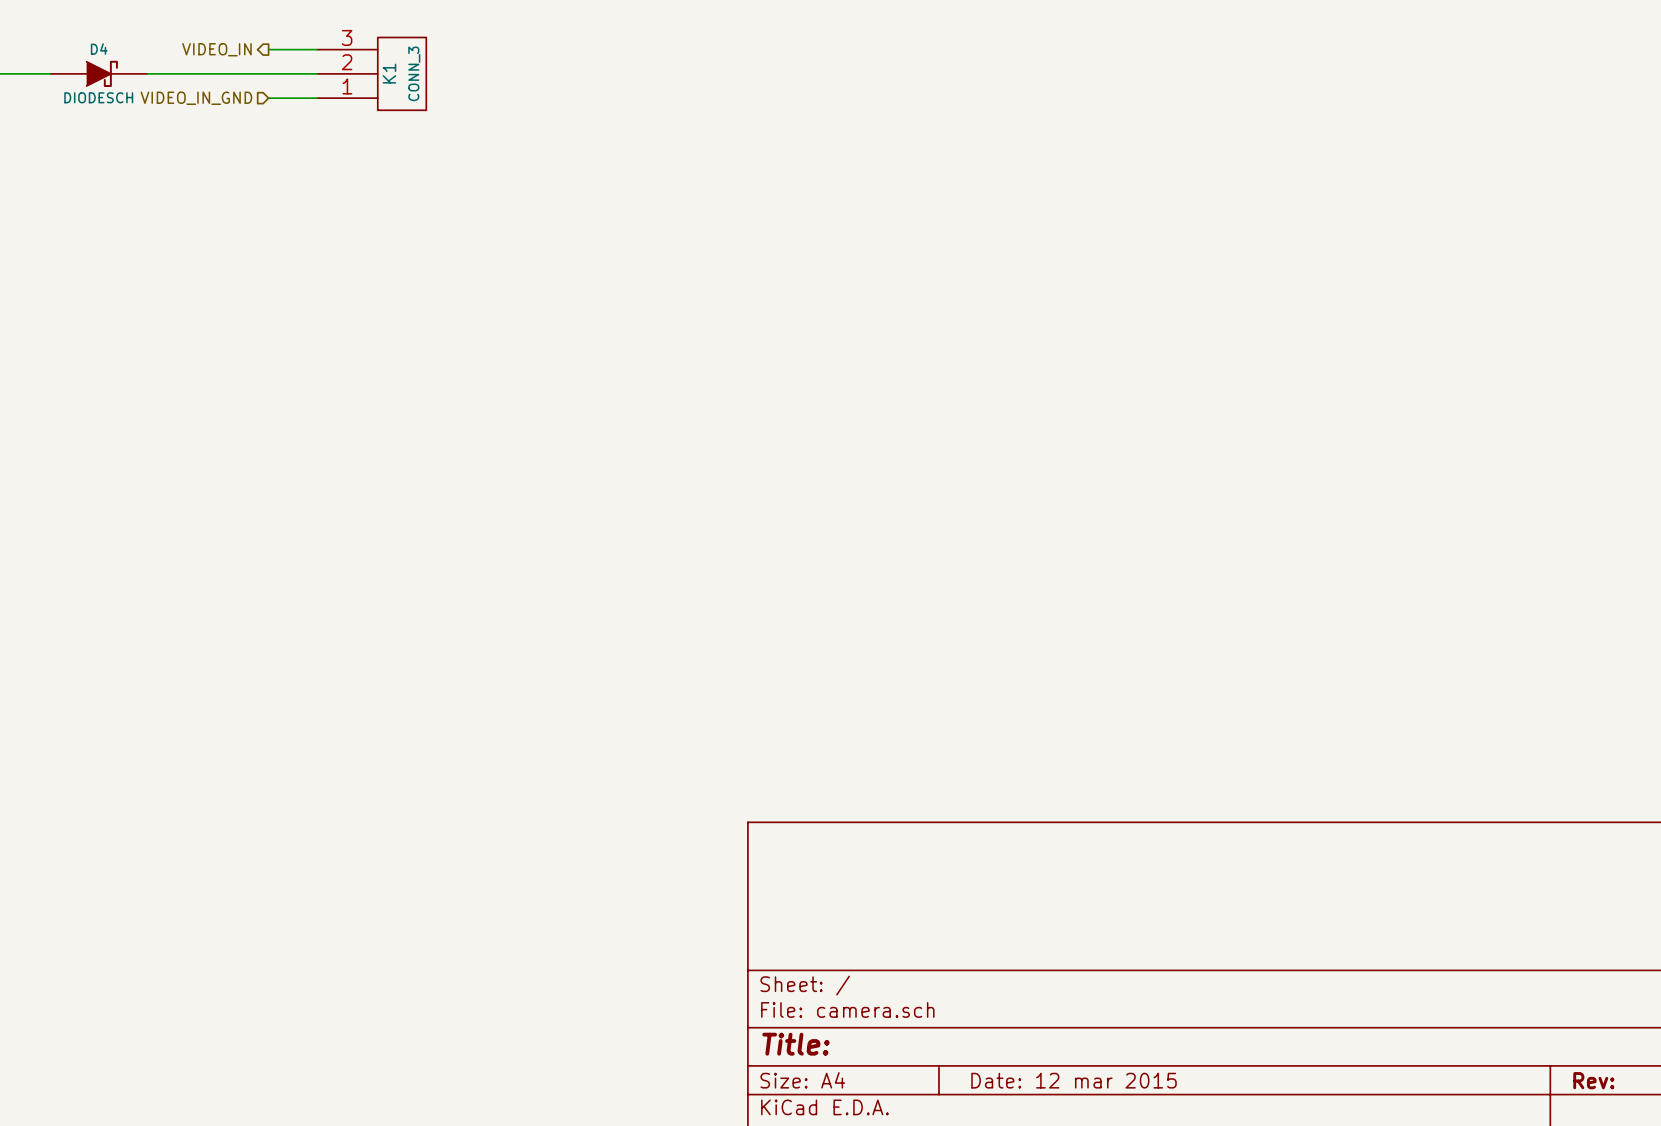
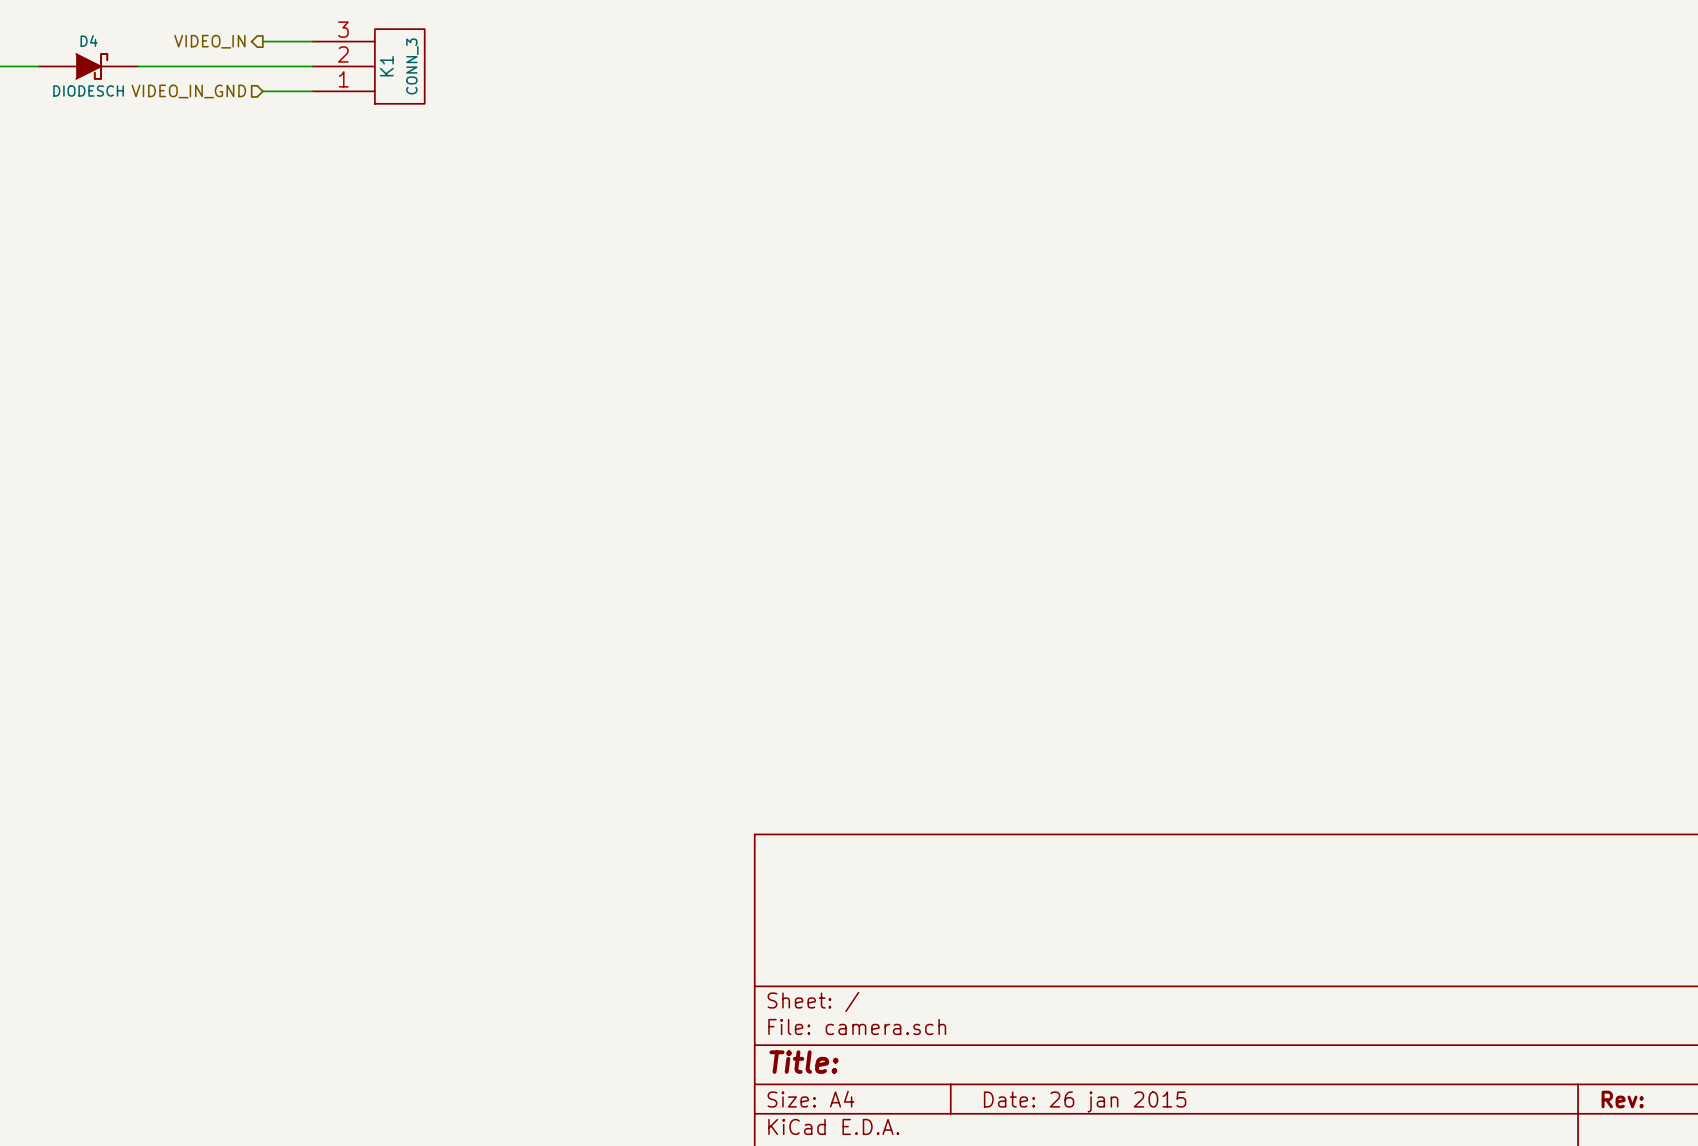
title block: Date: 12 mar 2015 (1074, 1080) -> Date: 26 jan 2015 (1085, 1101)

